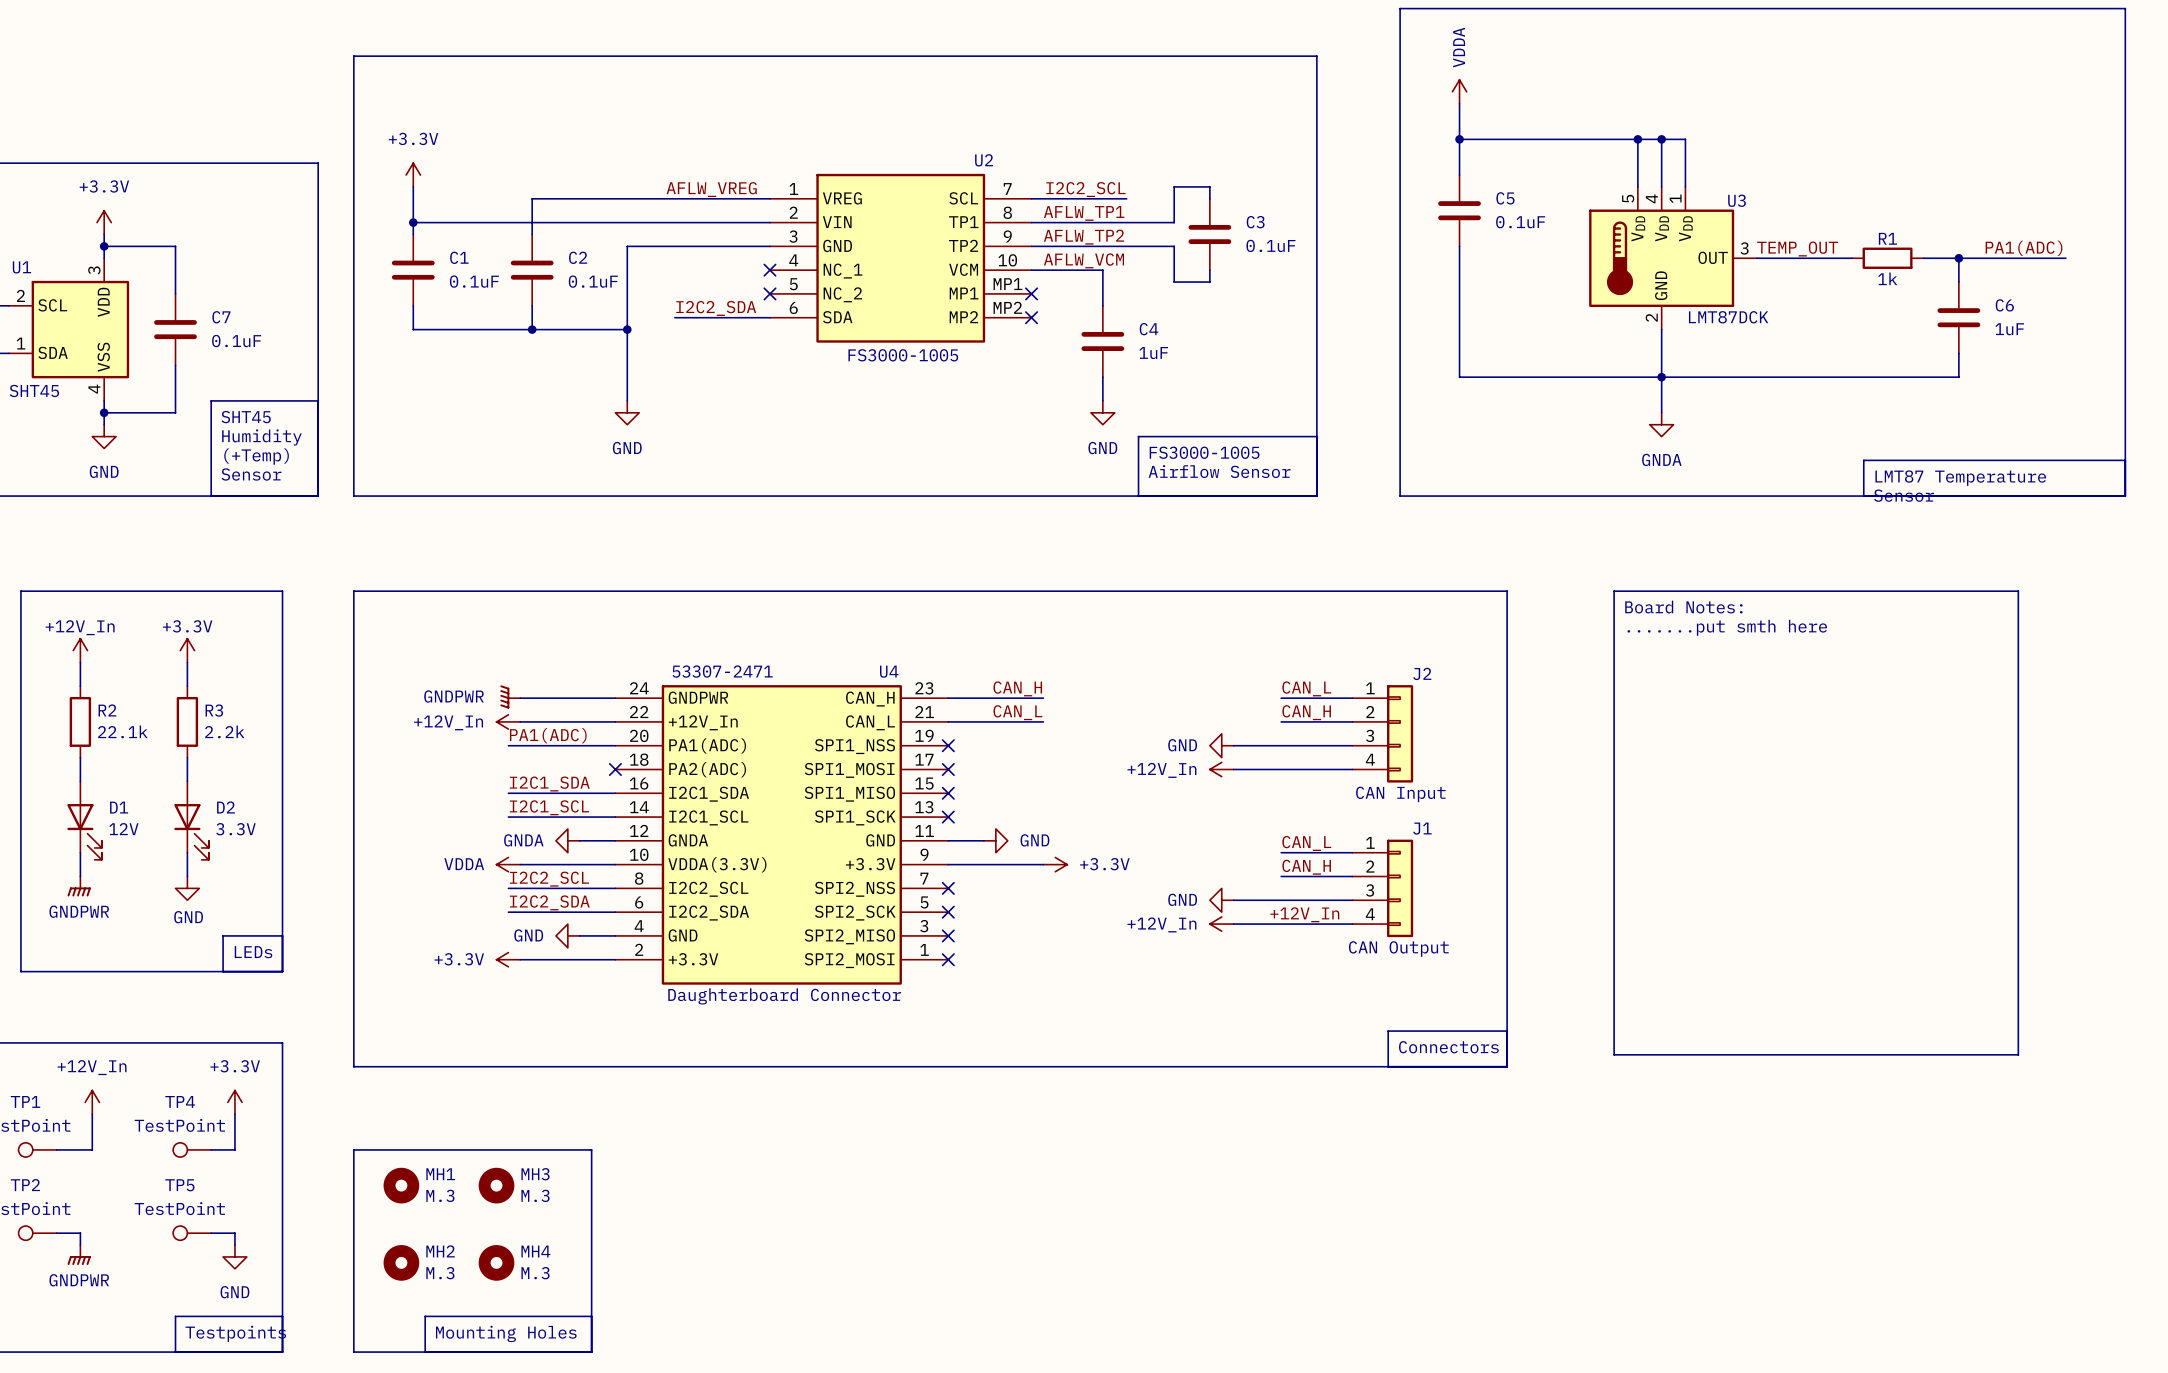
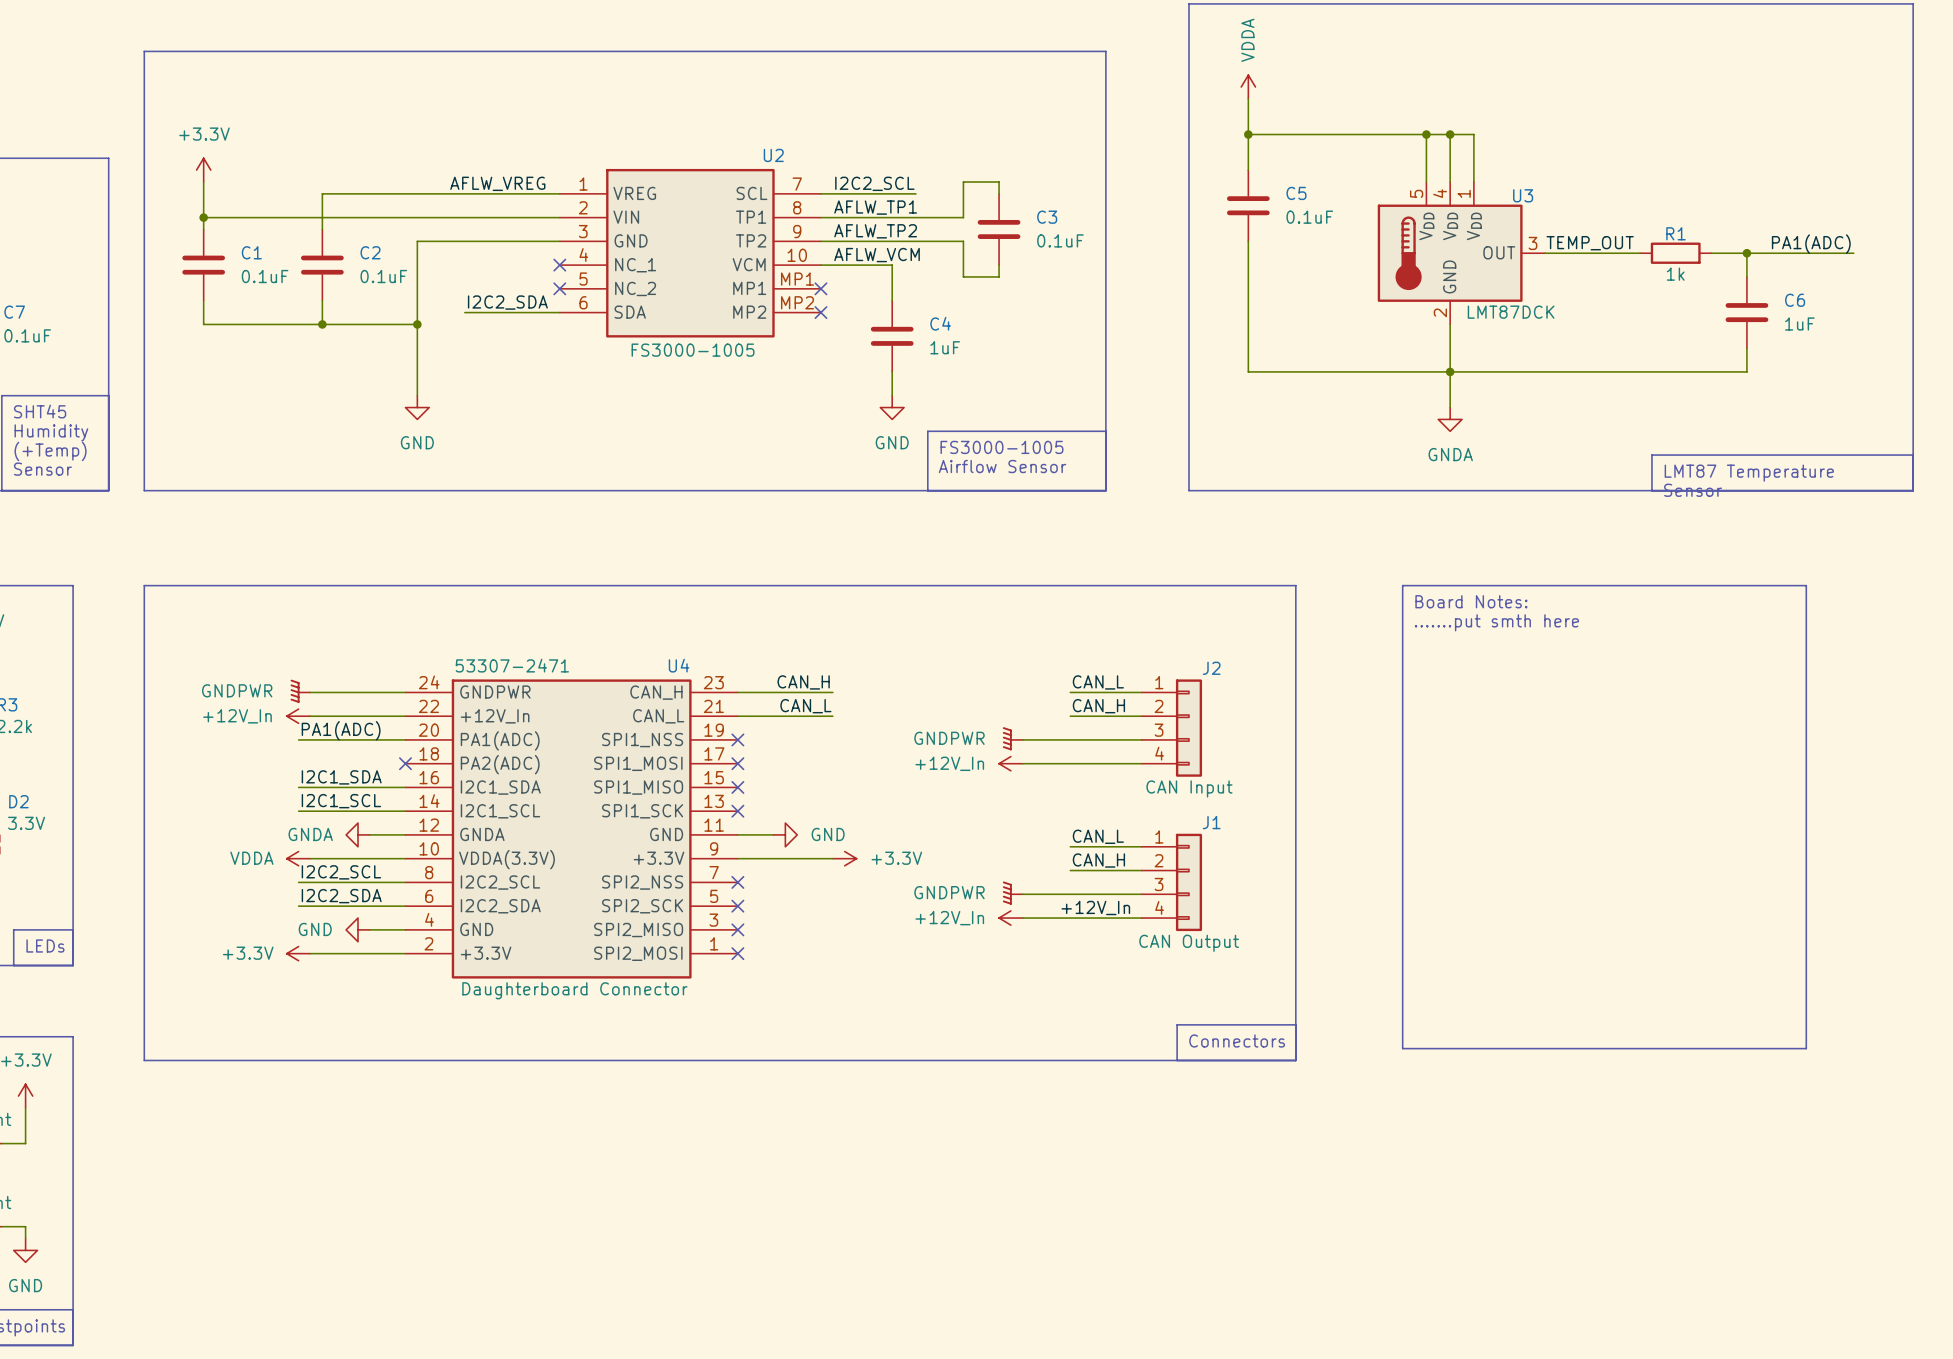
power symbol: GND (1221, 745) -> GNDPWR (1012, 738)
power symbol: GND (1221, 900) -> GNDPWR (1012, 893)
line: (353, 1149) (591, 1149) (591, 1352) (353, 1352) (353, 1149) -> none
MH1: M.3 (401, 1185) -> none
MH3: M.3 (496, 1185) -> none
MH2: M.3 (401, 1262) -> none
MH4: M.3 (496, 1262) -> none
line: (591, 1316) (425, 1316) (425, 1352) -> none
text: Mounting Holes (506, 1333) -> none

